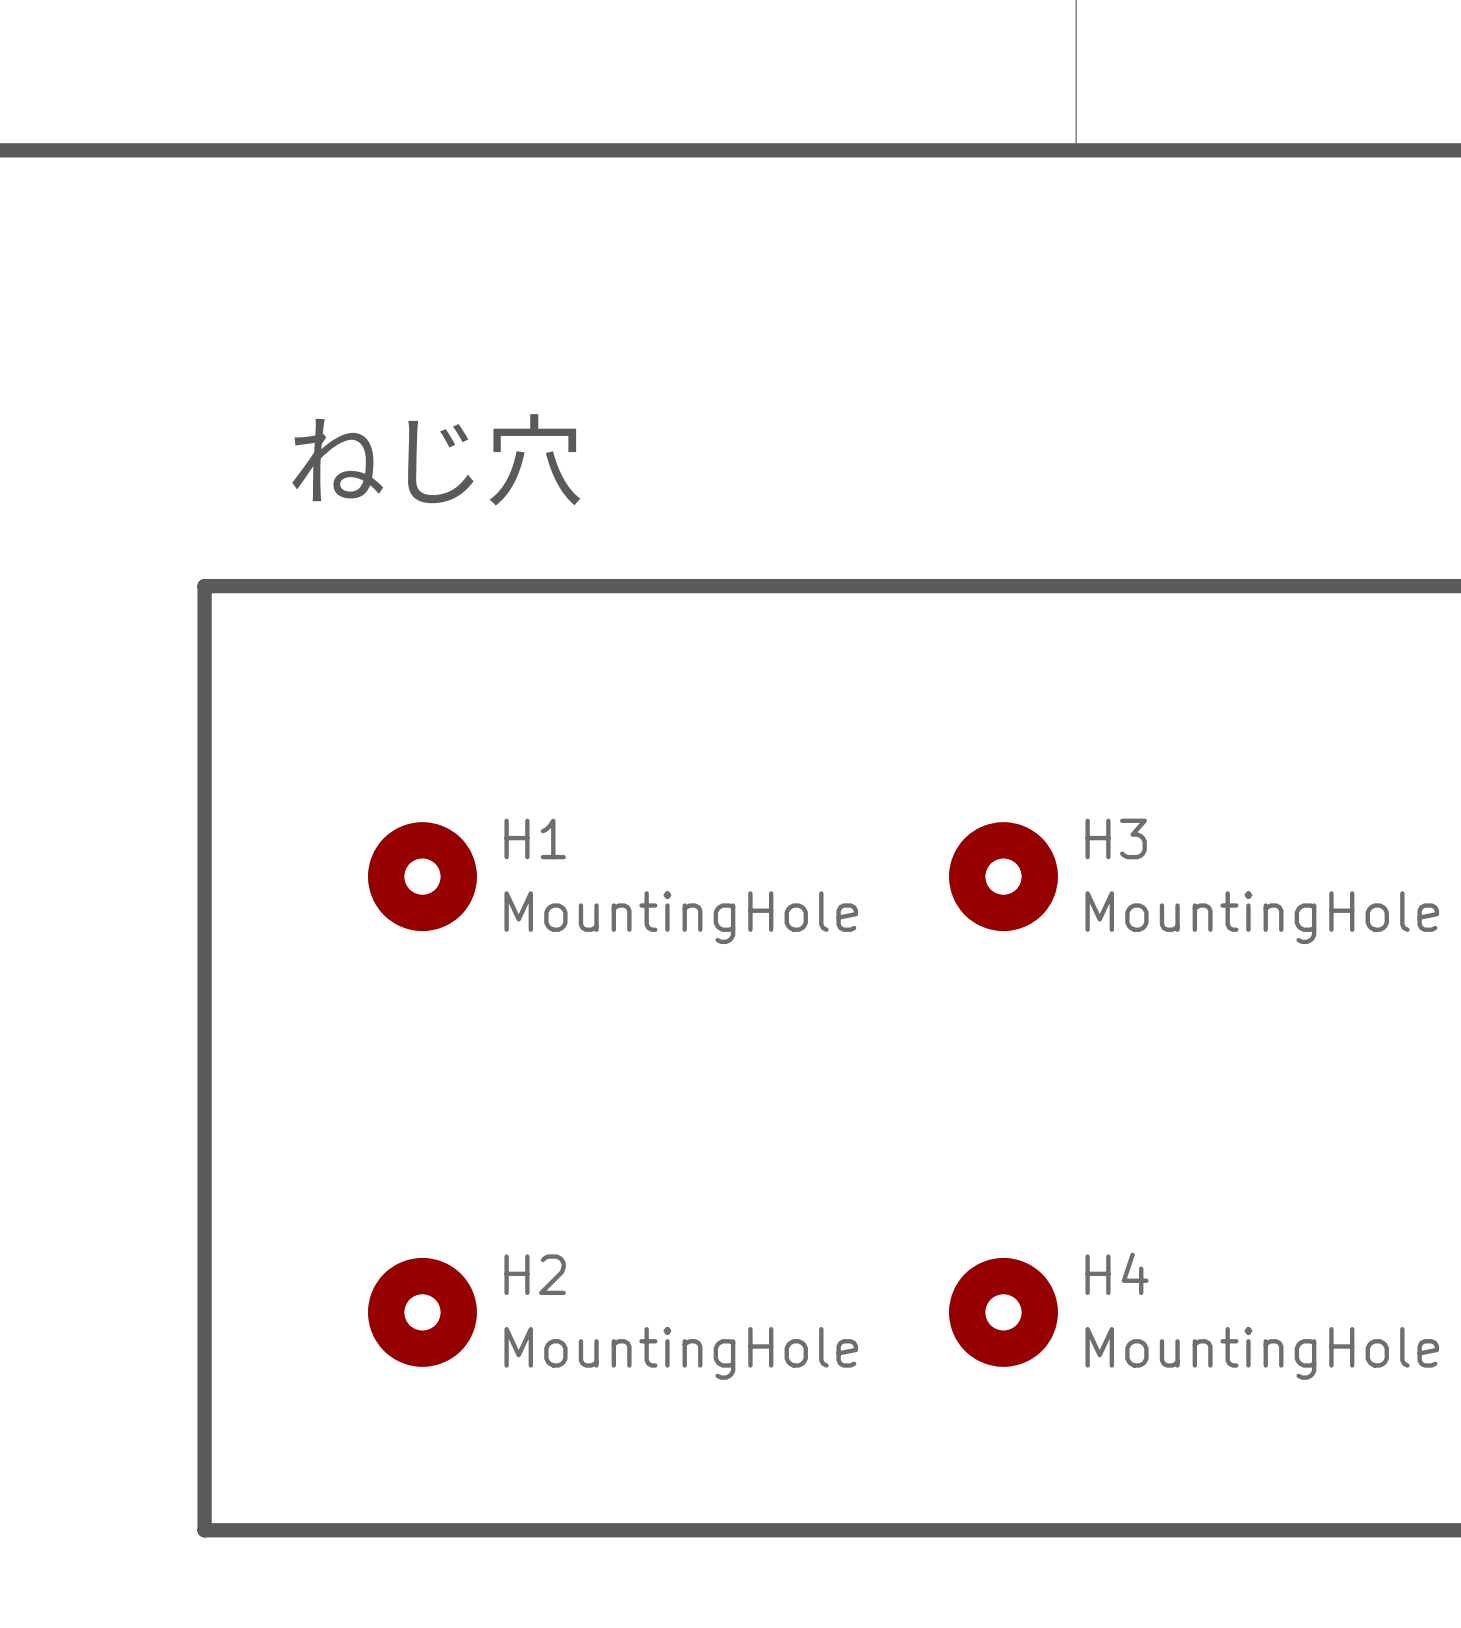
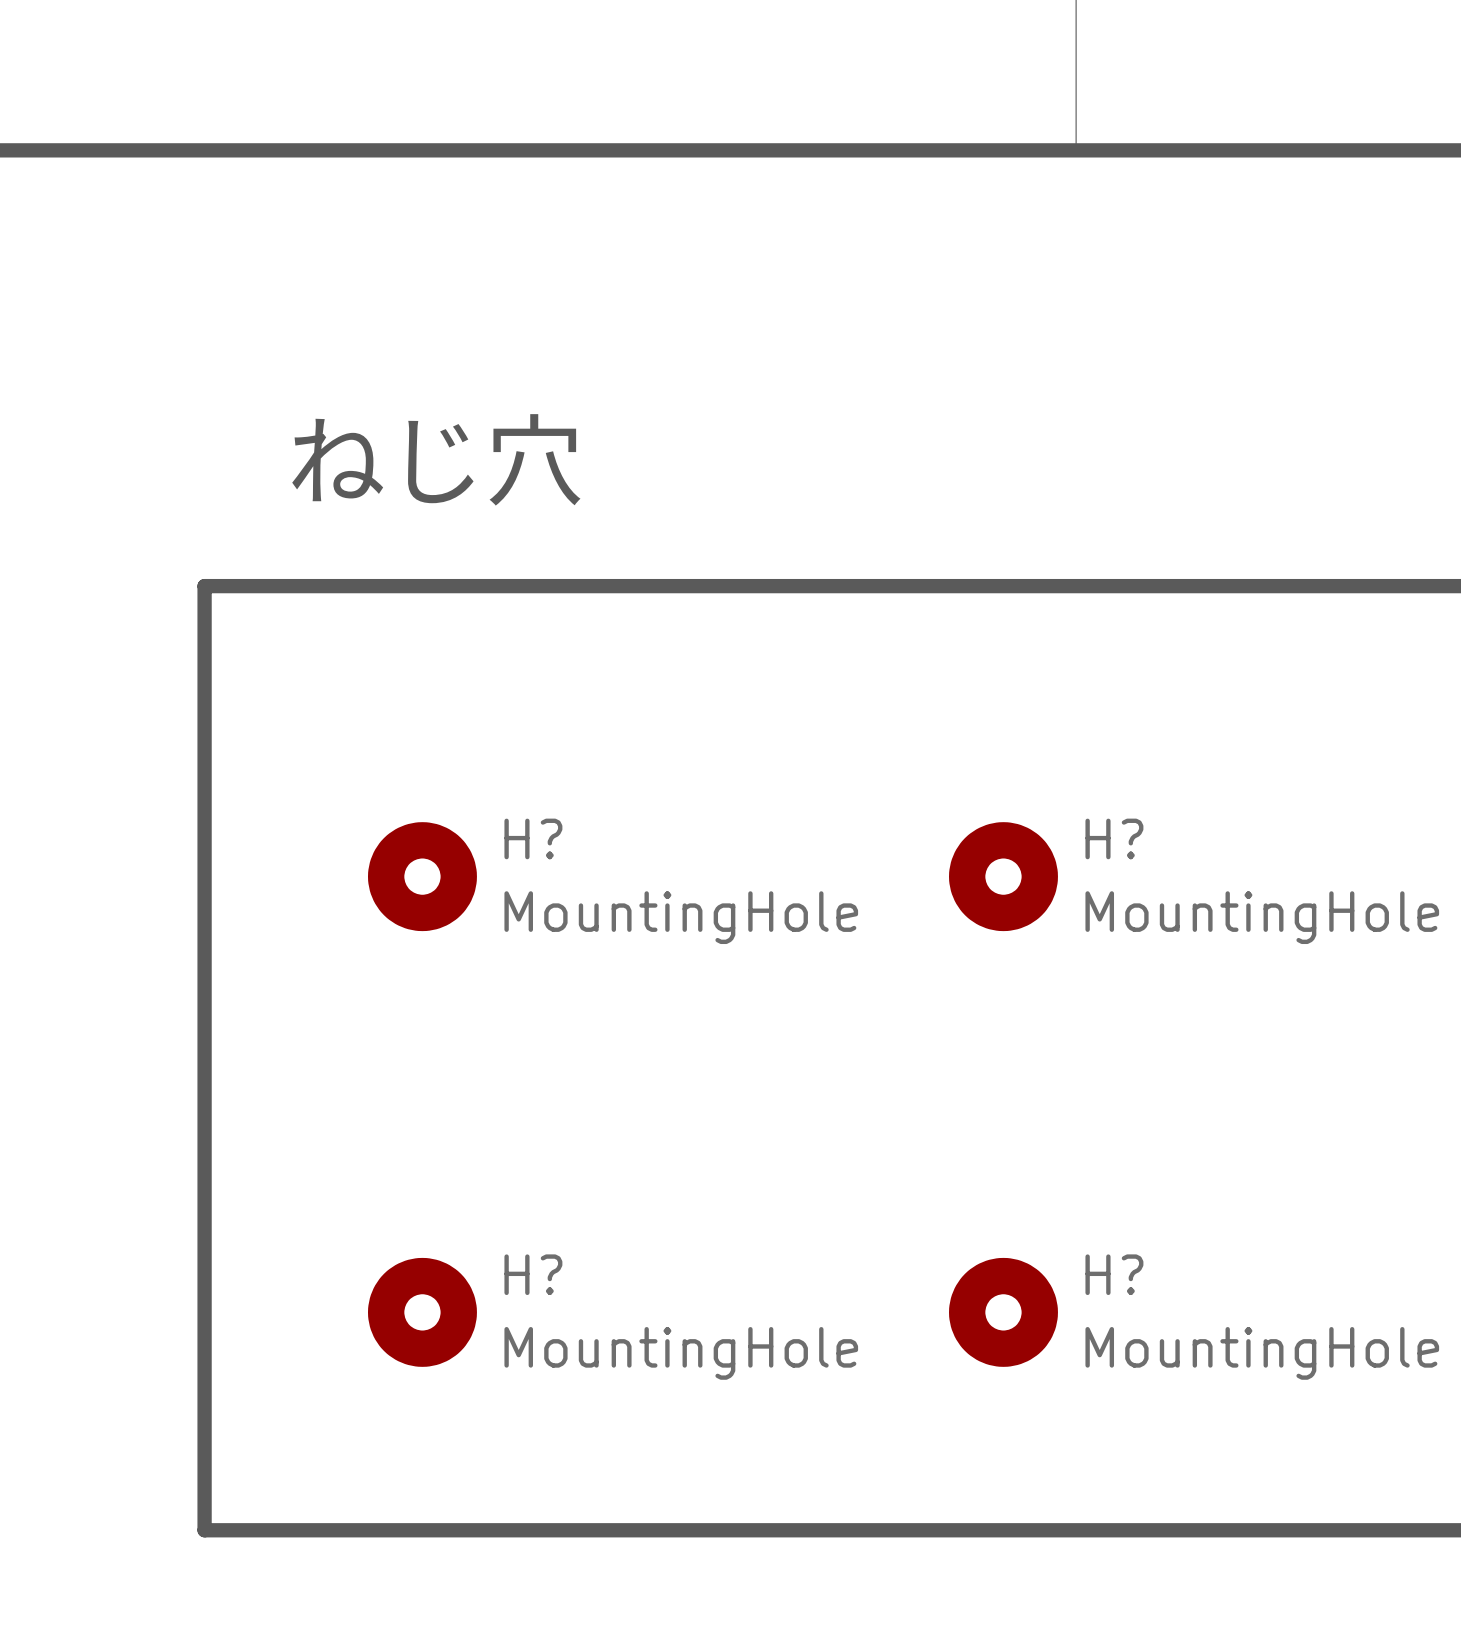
H1 name: H1 (535, 838) -> H? (533, 838)
H3 name: H3 (1116, 838) -> H? (1114, 838)
H4 name: H4 (1117, 1273) -> H? (1114, 1274)
H2 name: H2 (535, 1274) -> H? (533, 1274)

